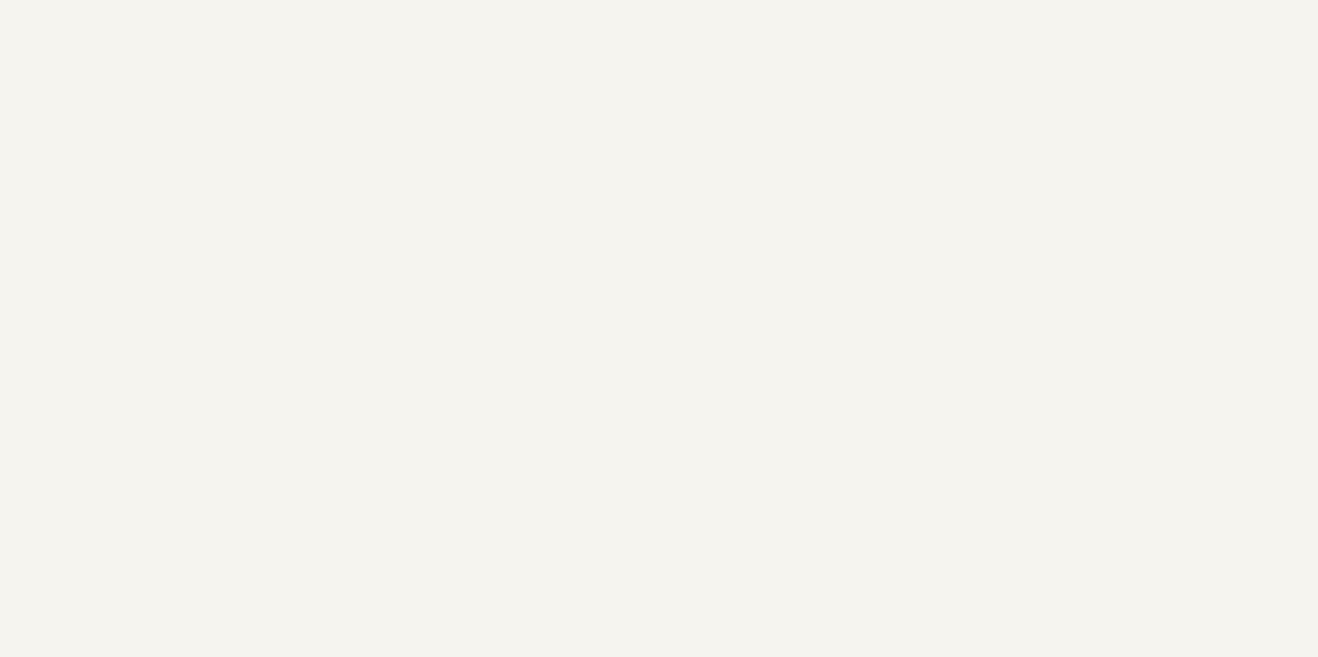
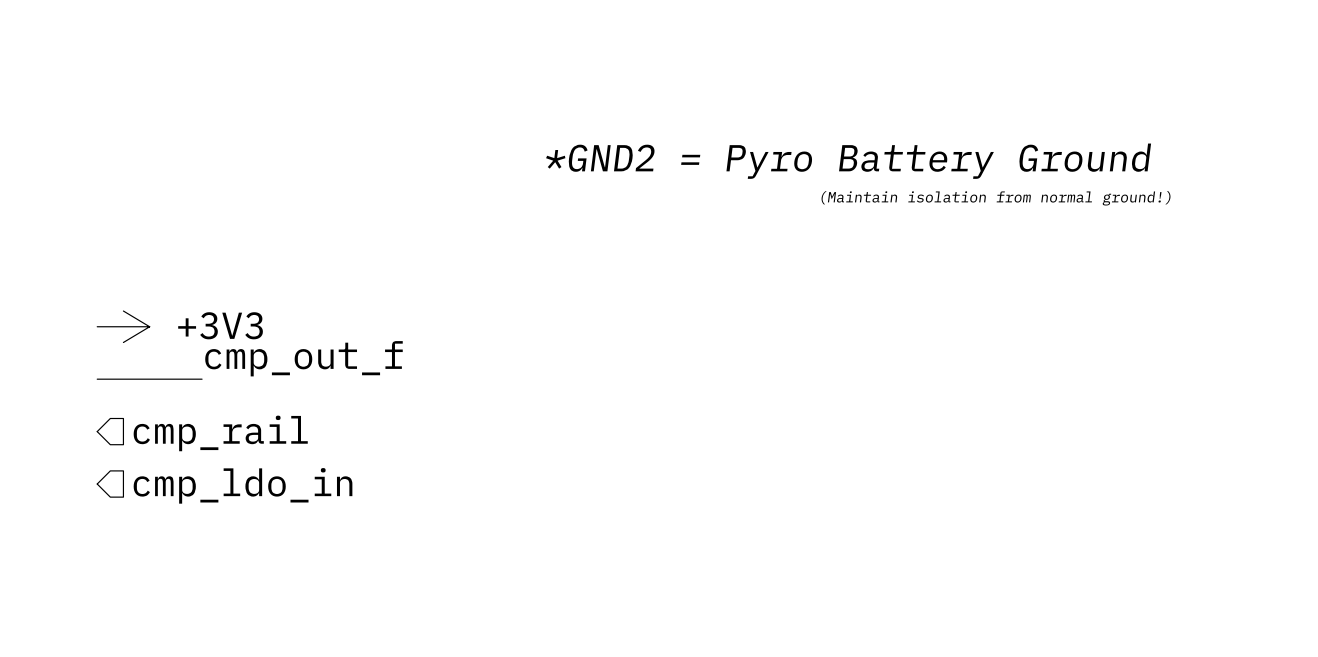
text: none -> *GND2 = Pyro Battery Ground (848, 161)
text: none -> (Maintain isolation from normal ground!) (996, 198)
power symbol: none -> +3V3 (123, 326)
label: none -> cmp_out_f (303, 358)
wire: none -> (97, 379) (202, 379)
hierarchical label: none -> cmp_rail (220, 433)
hierarchical label: none -> cmp_ldo_in (243, 485)

